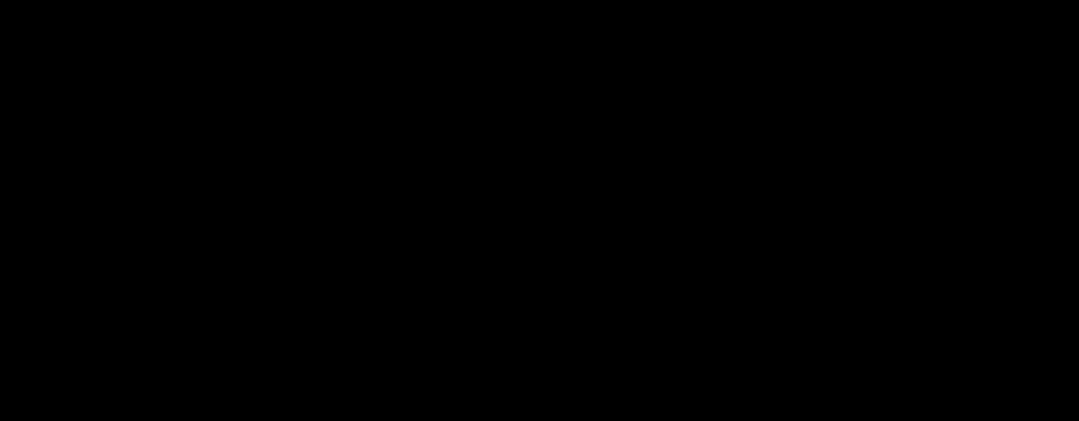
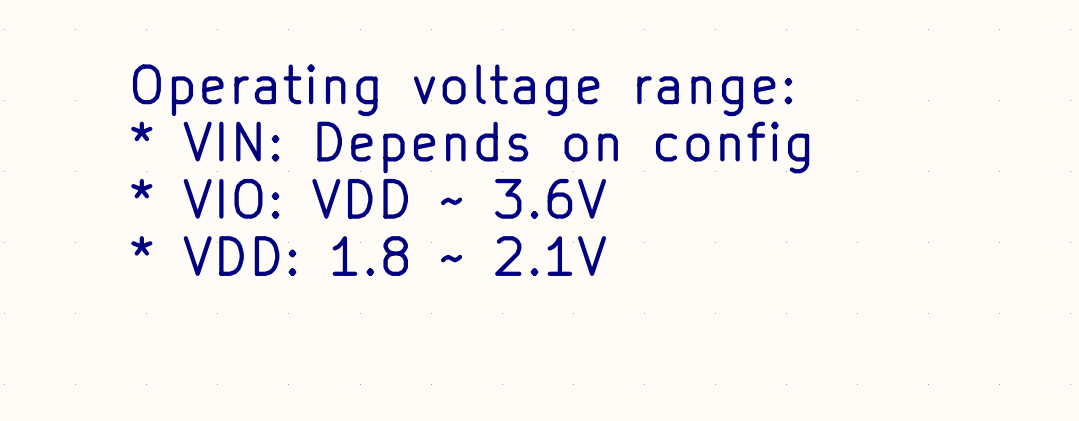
text: none -> Operating voltage range: (462, 90)
text: none -> * VIN: Depends on config (470, 147)
text: none -> * VIO: VDD ~ 3.6V (368, 198)
text: none -> * VDD: 1.8 ~ 2.1V (368, 256)

